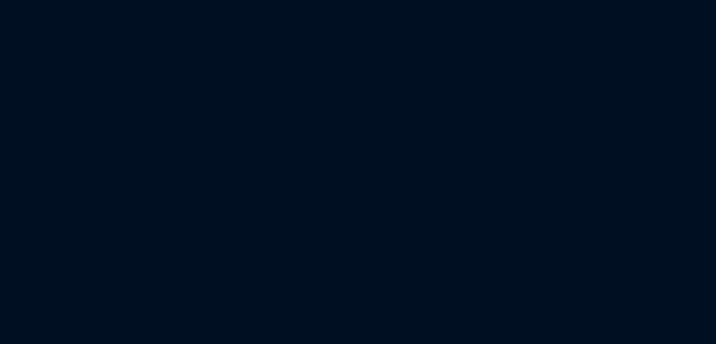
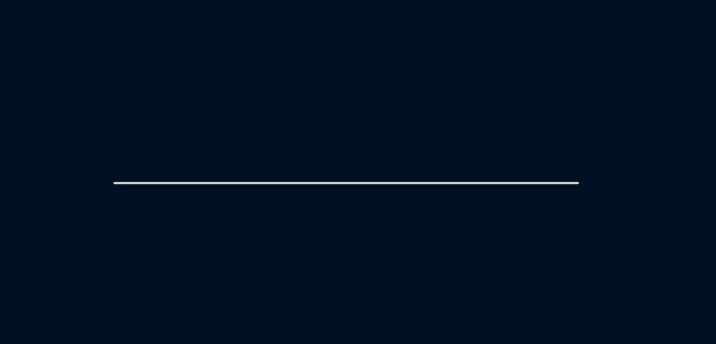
board edge: none -> (577, 183) (114, 183)

